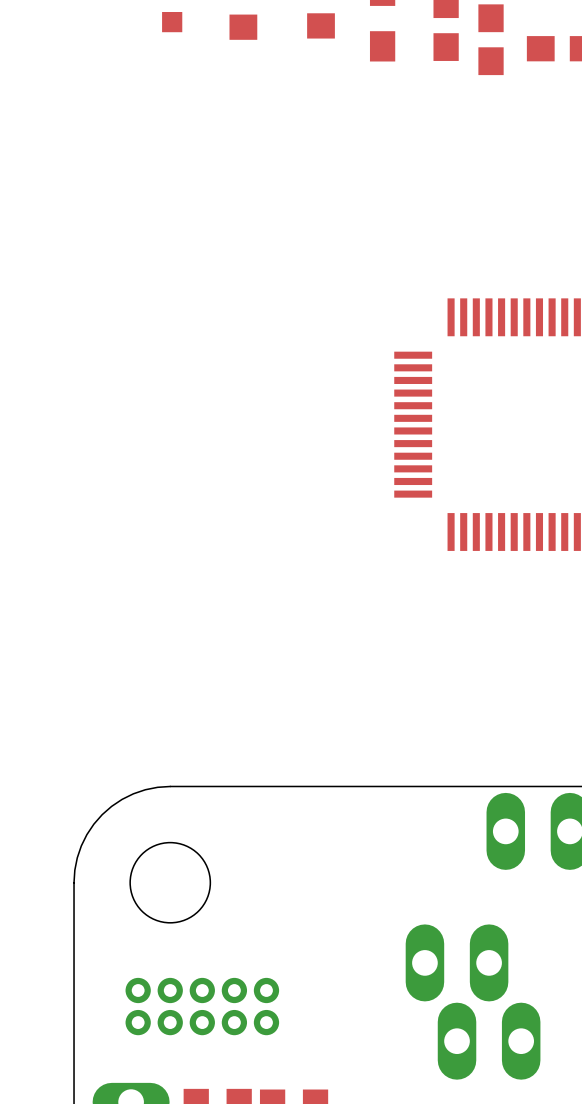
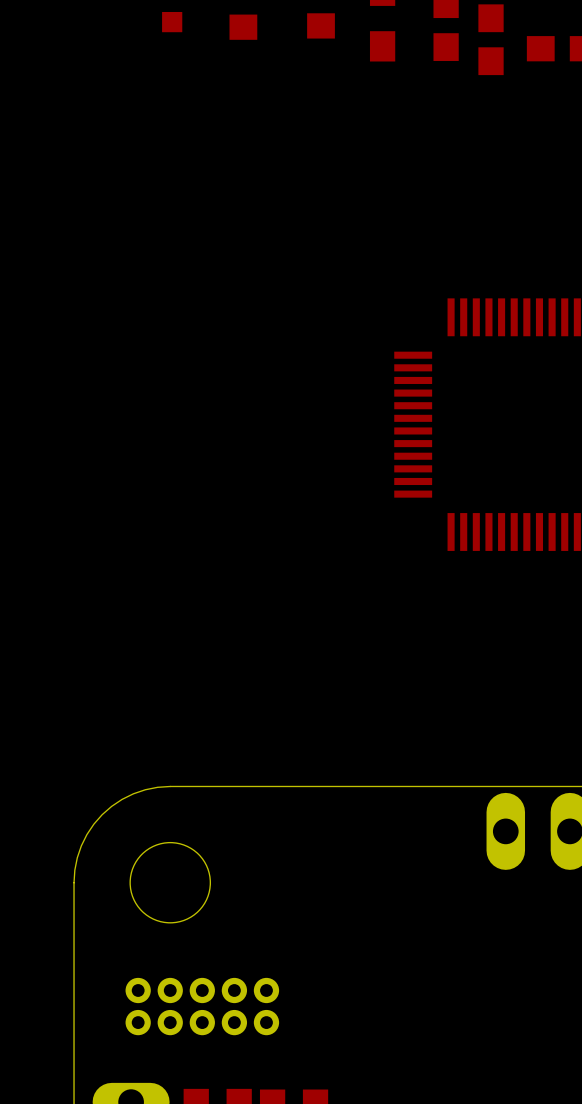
part: (457, 962) -> none
part: (489, 1041) -> none

